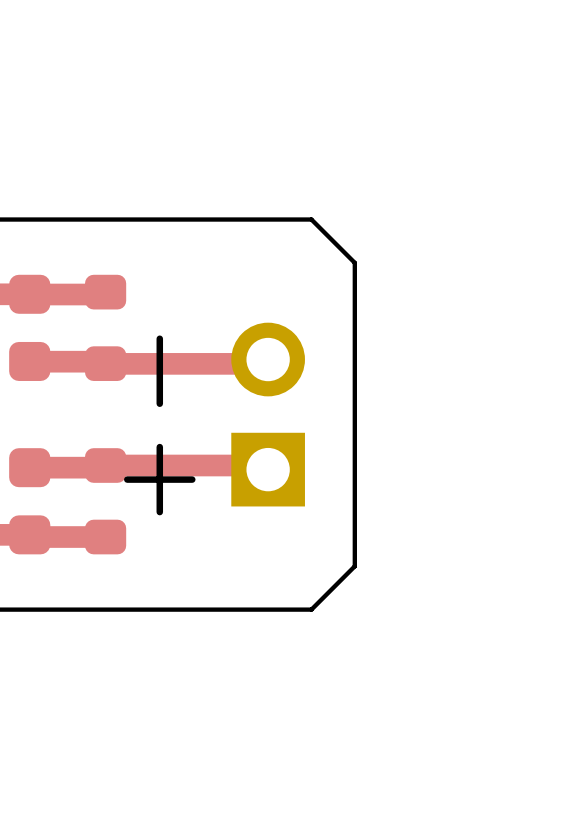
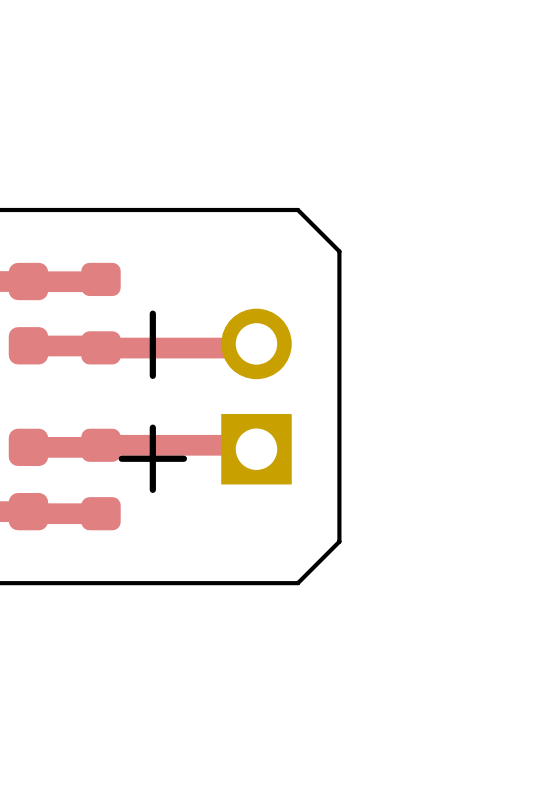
line: (159, 392) (159, 403) -> (152, 313) (152, 324)

